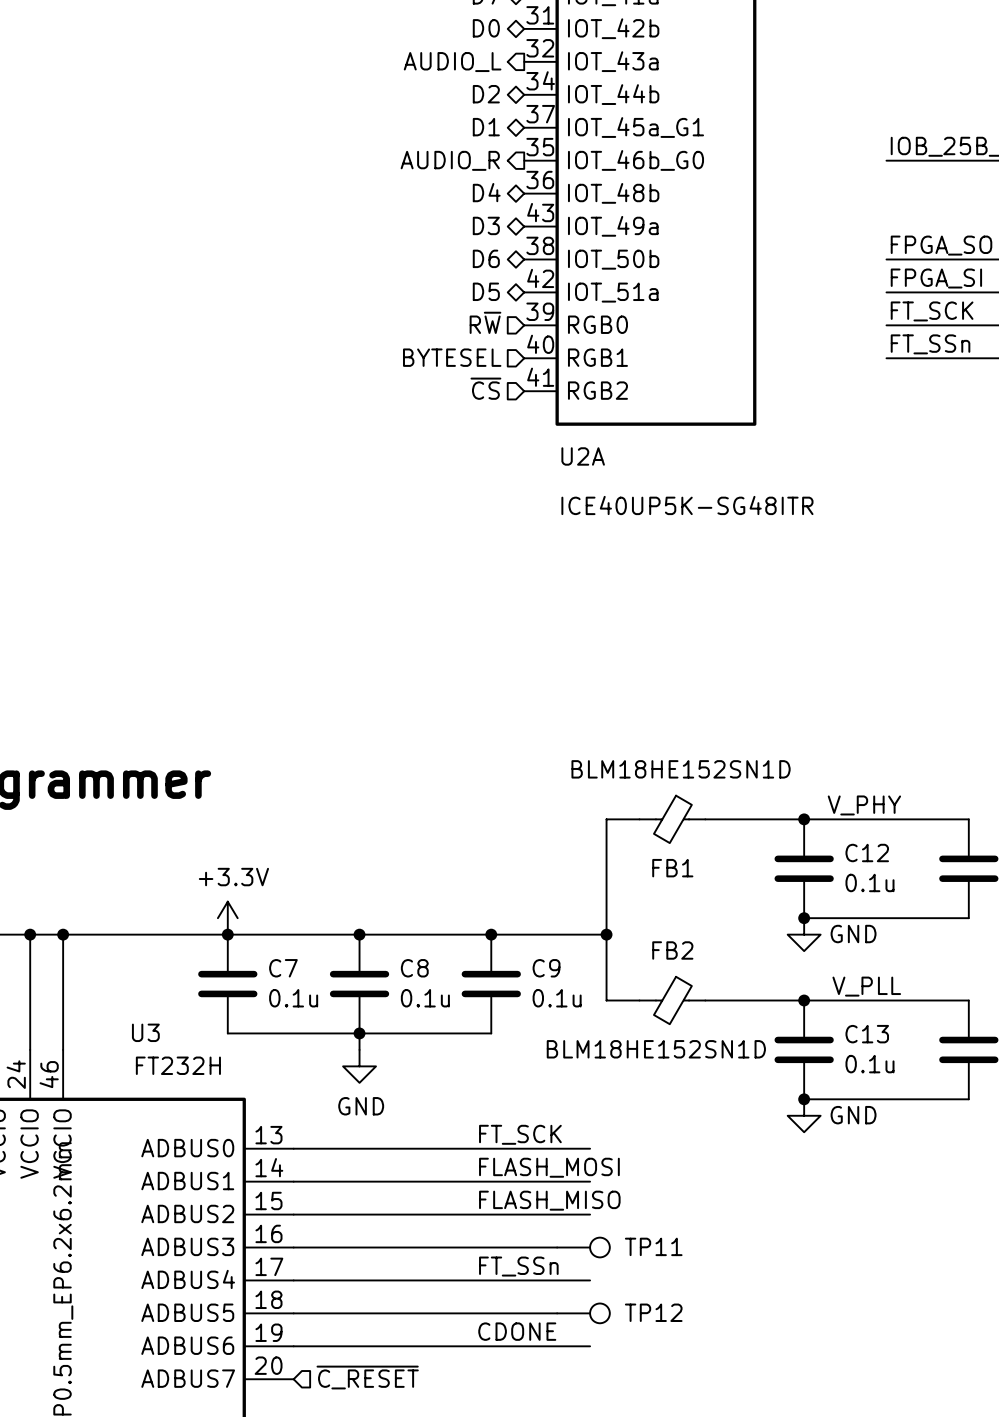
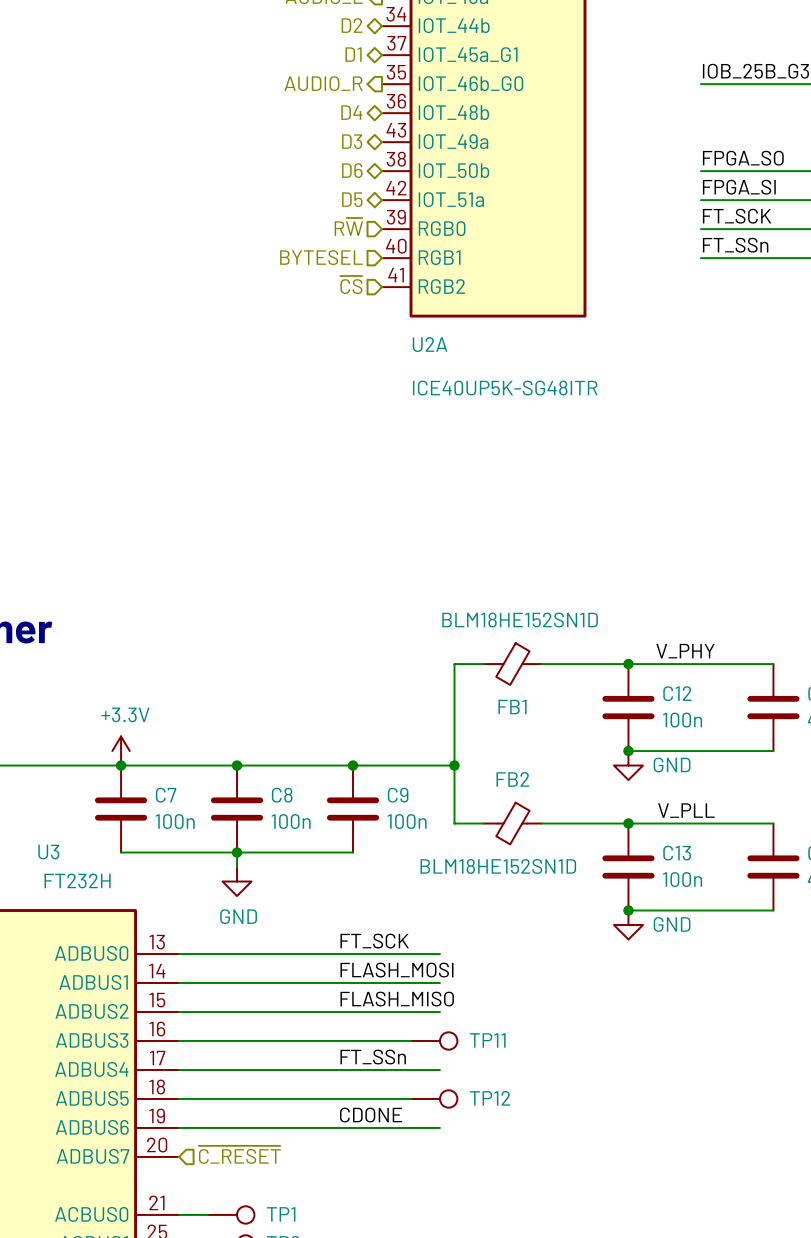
C12 value: 0.1u (869, 882) -> 100n (682, 720)
C7 value: 0.1u (293, 998) -> 100n (175, 821)
C8 value: 0.1u (425, 998) -> 100n (291, 821)
C9 value: 0.1u (557, 998) -> 100n (407, 821)
C13 value: 0.1u (869, 1064) -> 100n (682, 879)

